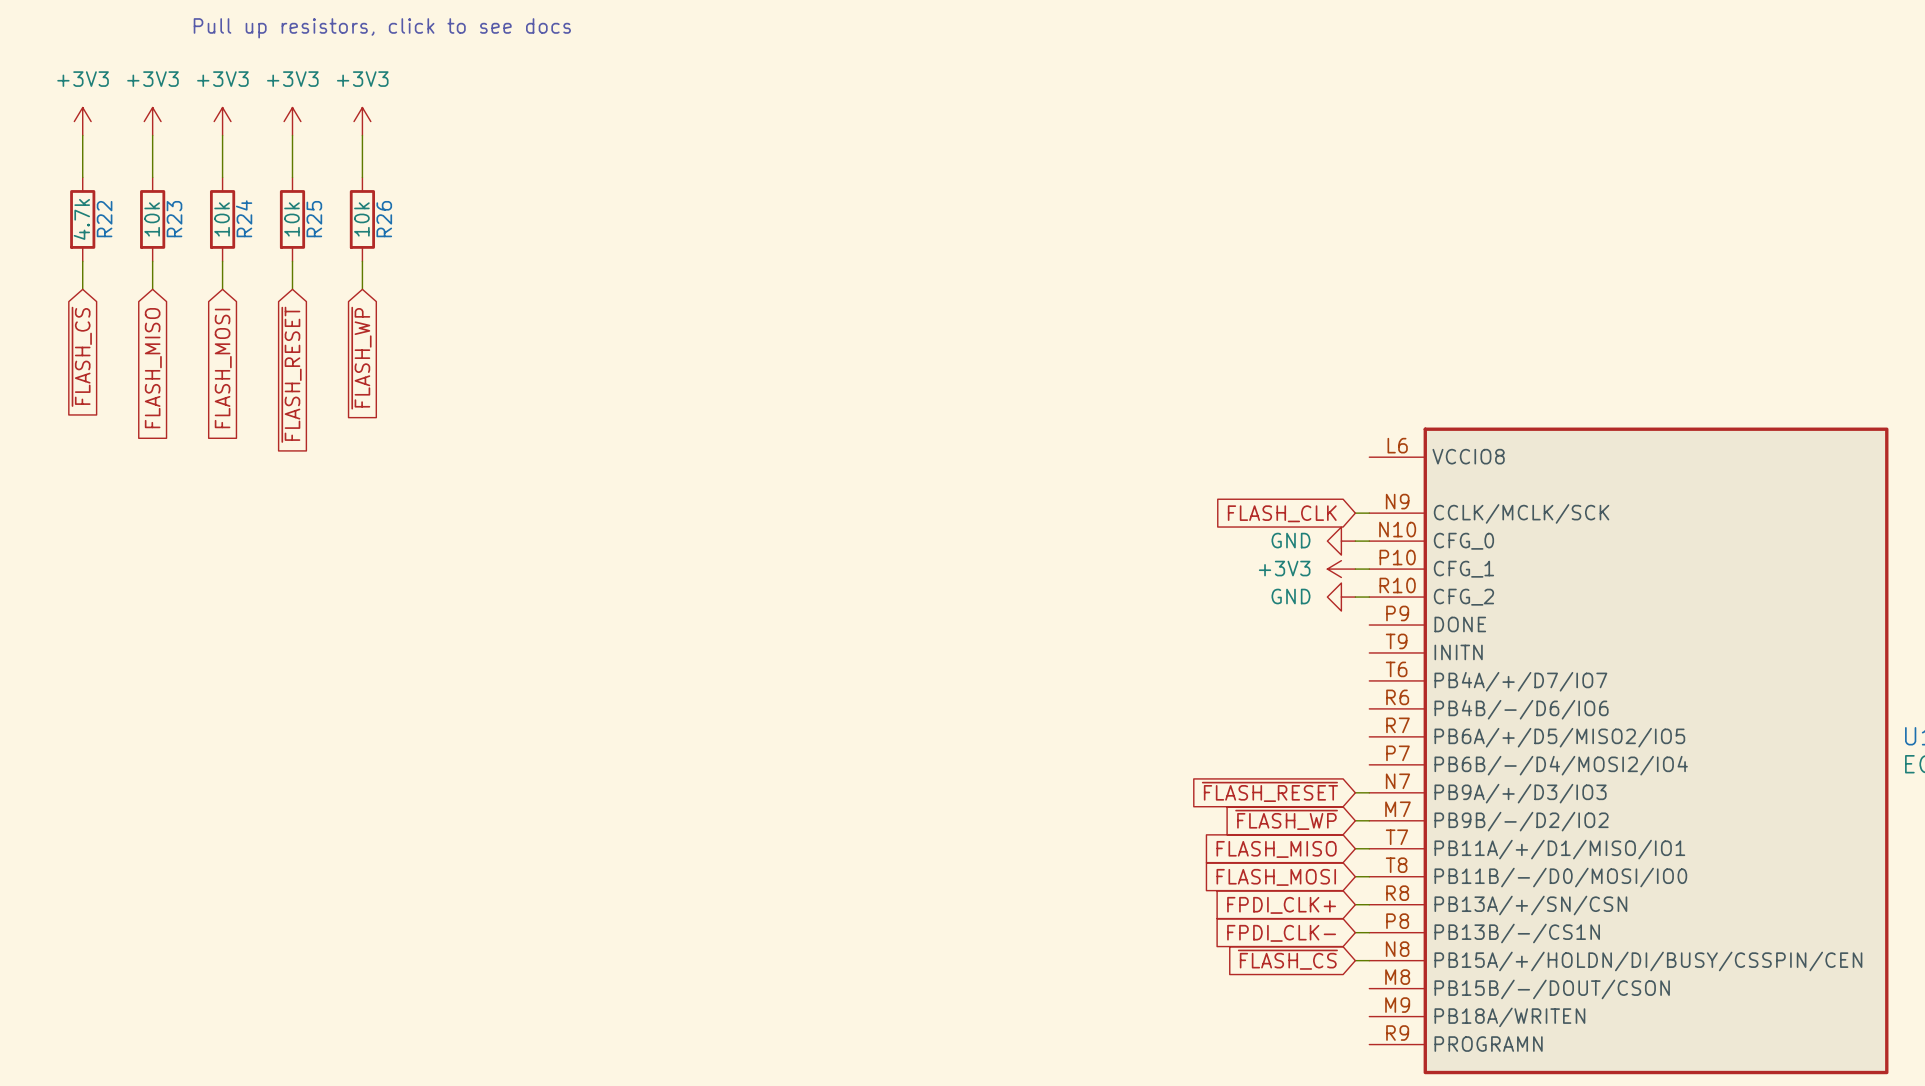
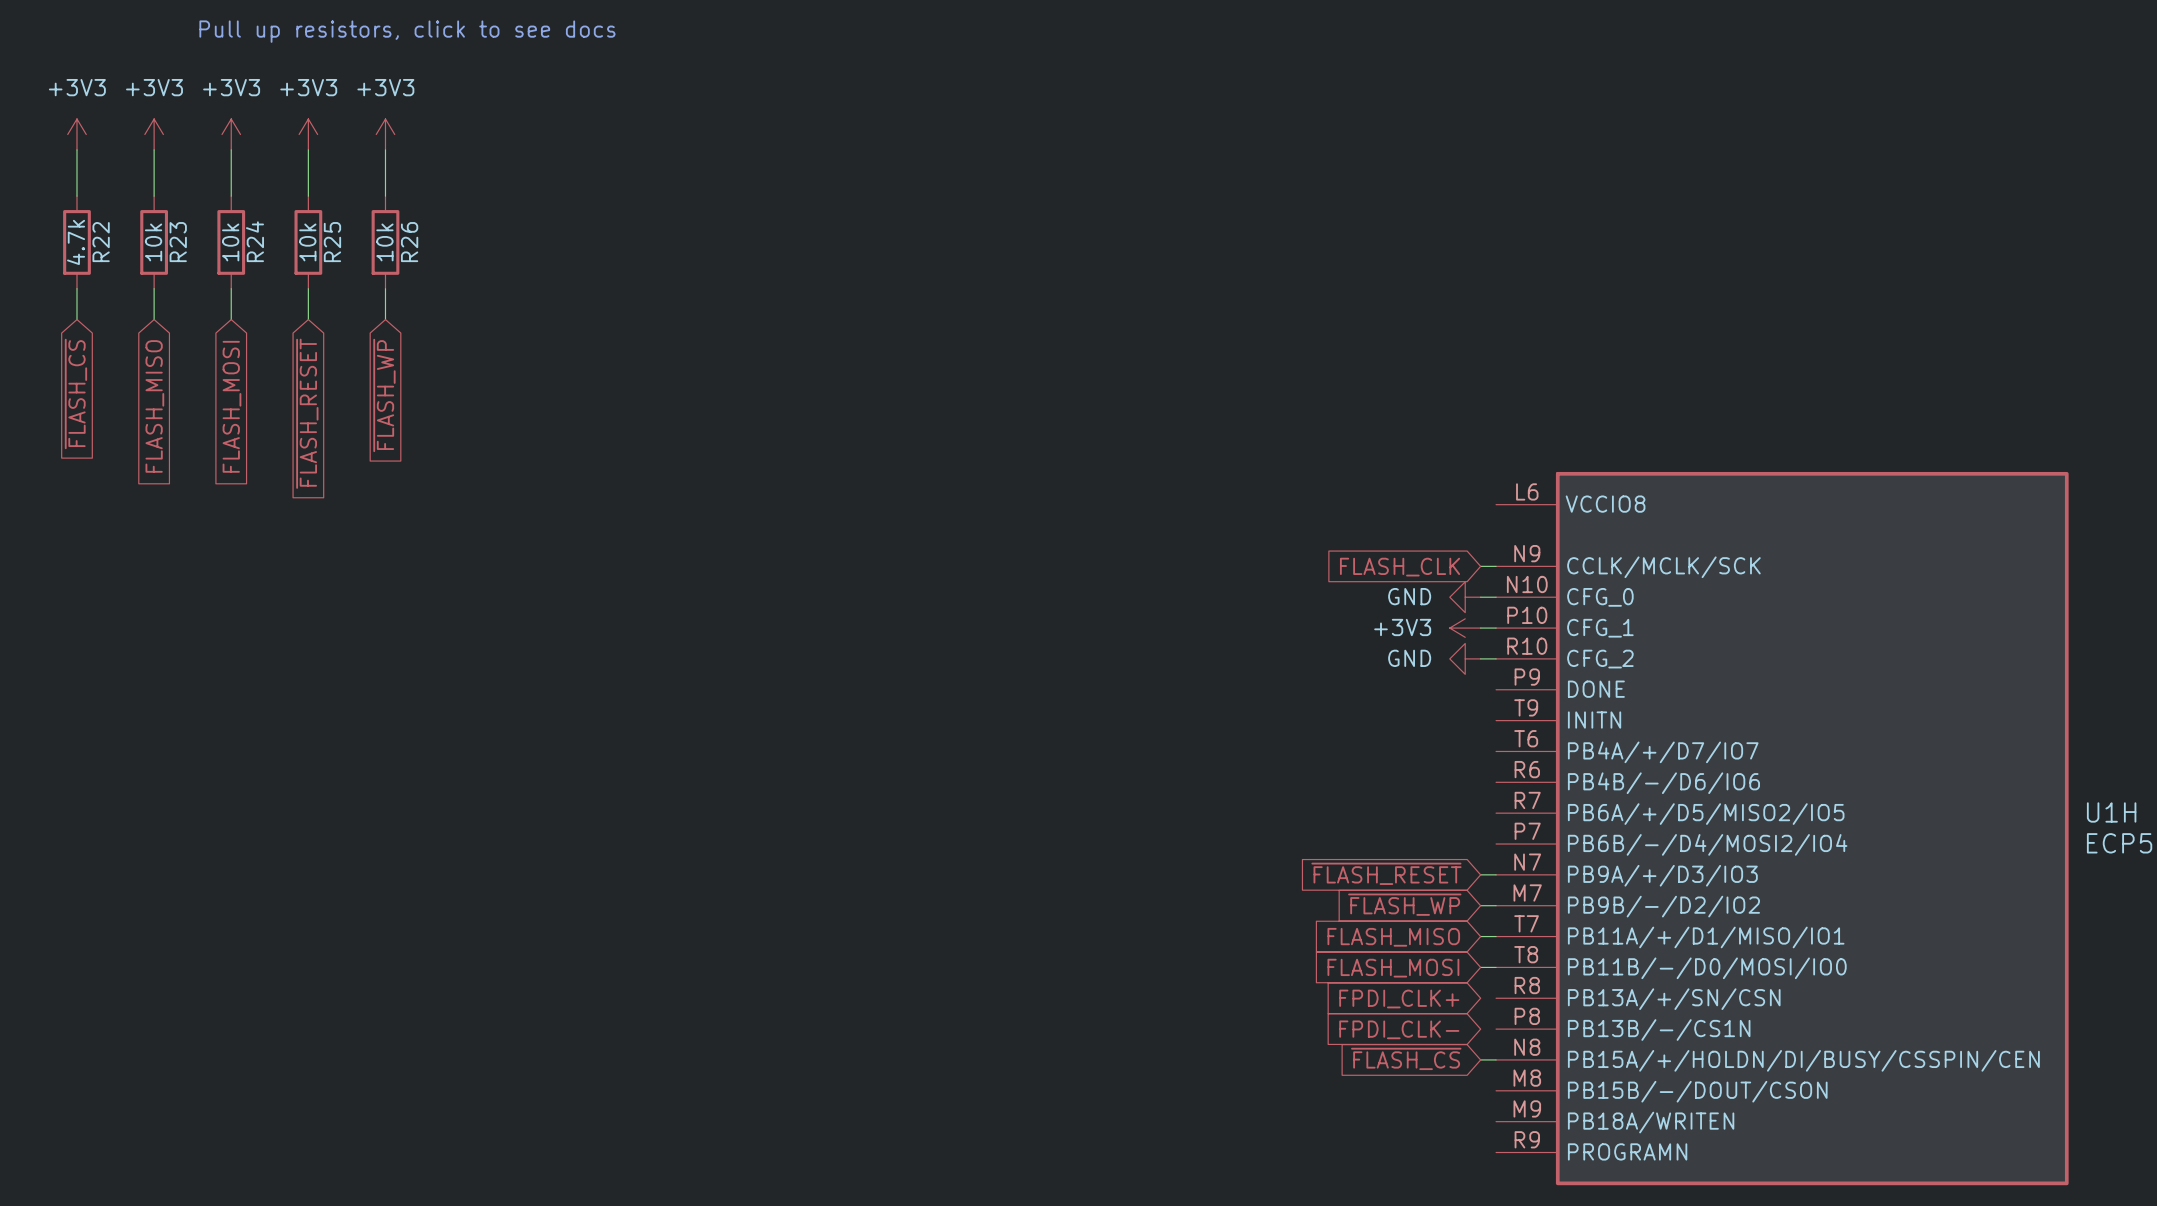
wire: (1355, 904) (1369, 904) -> none
wire: (1355, 932) (1369, 932) -> none

